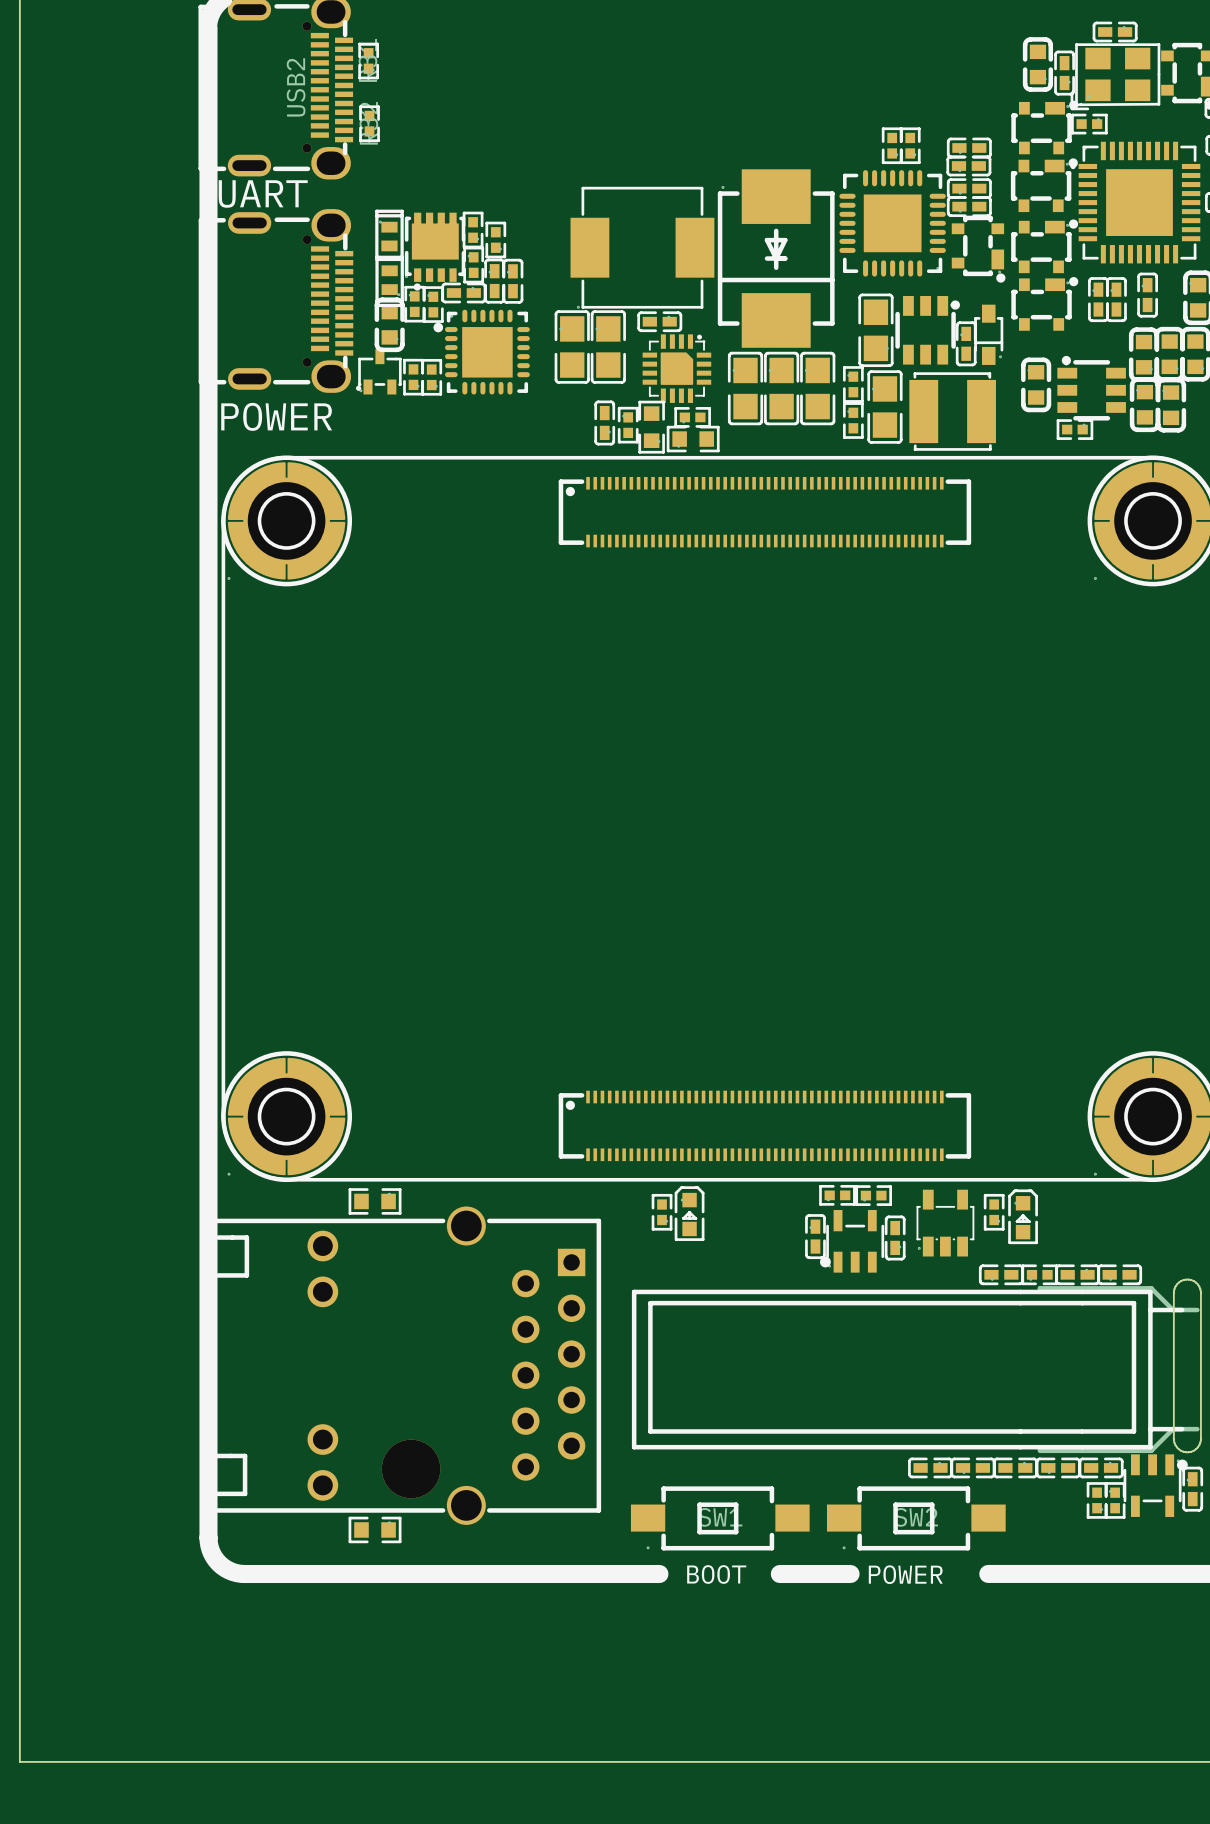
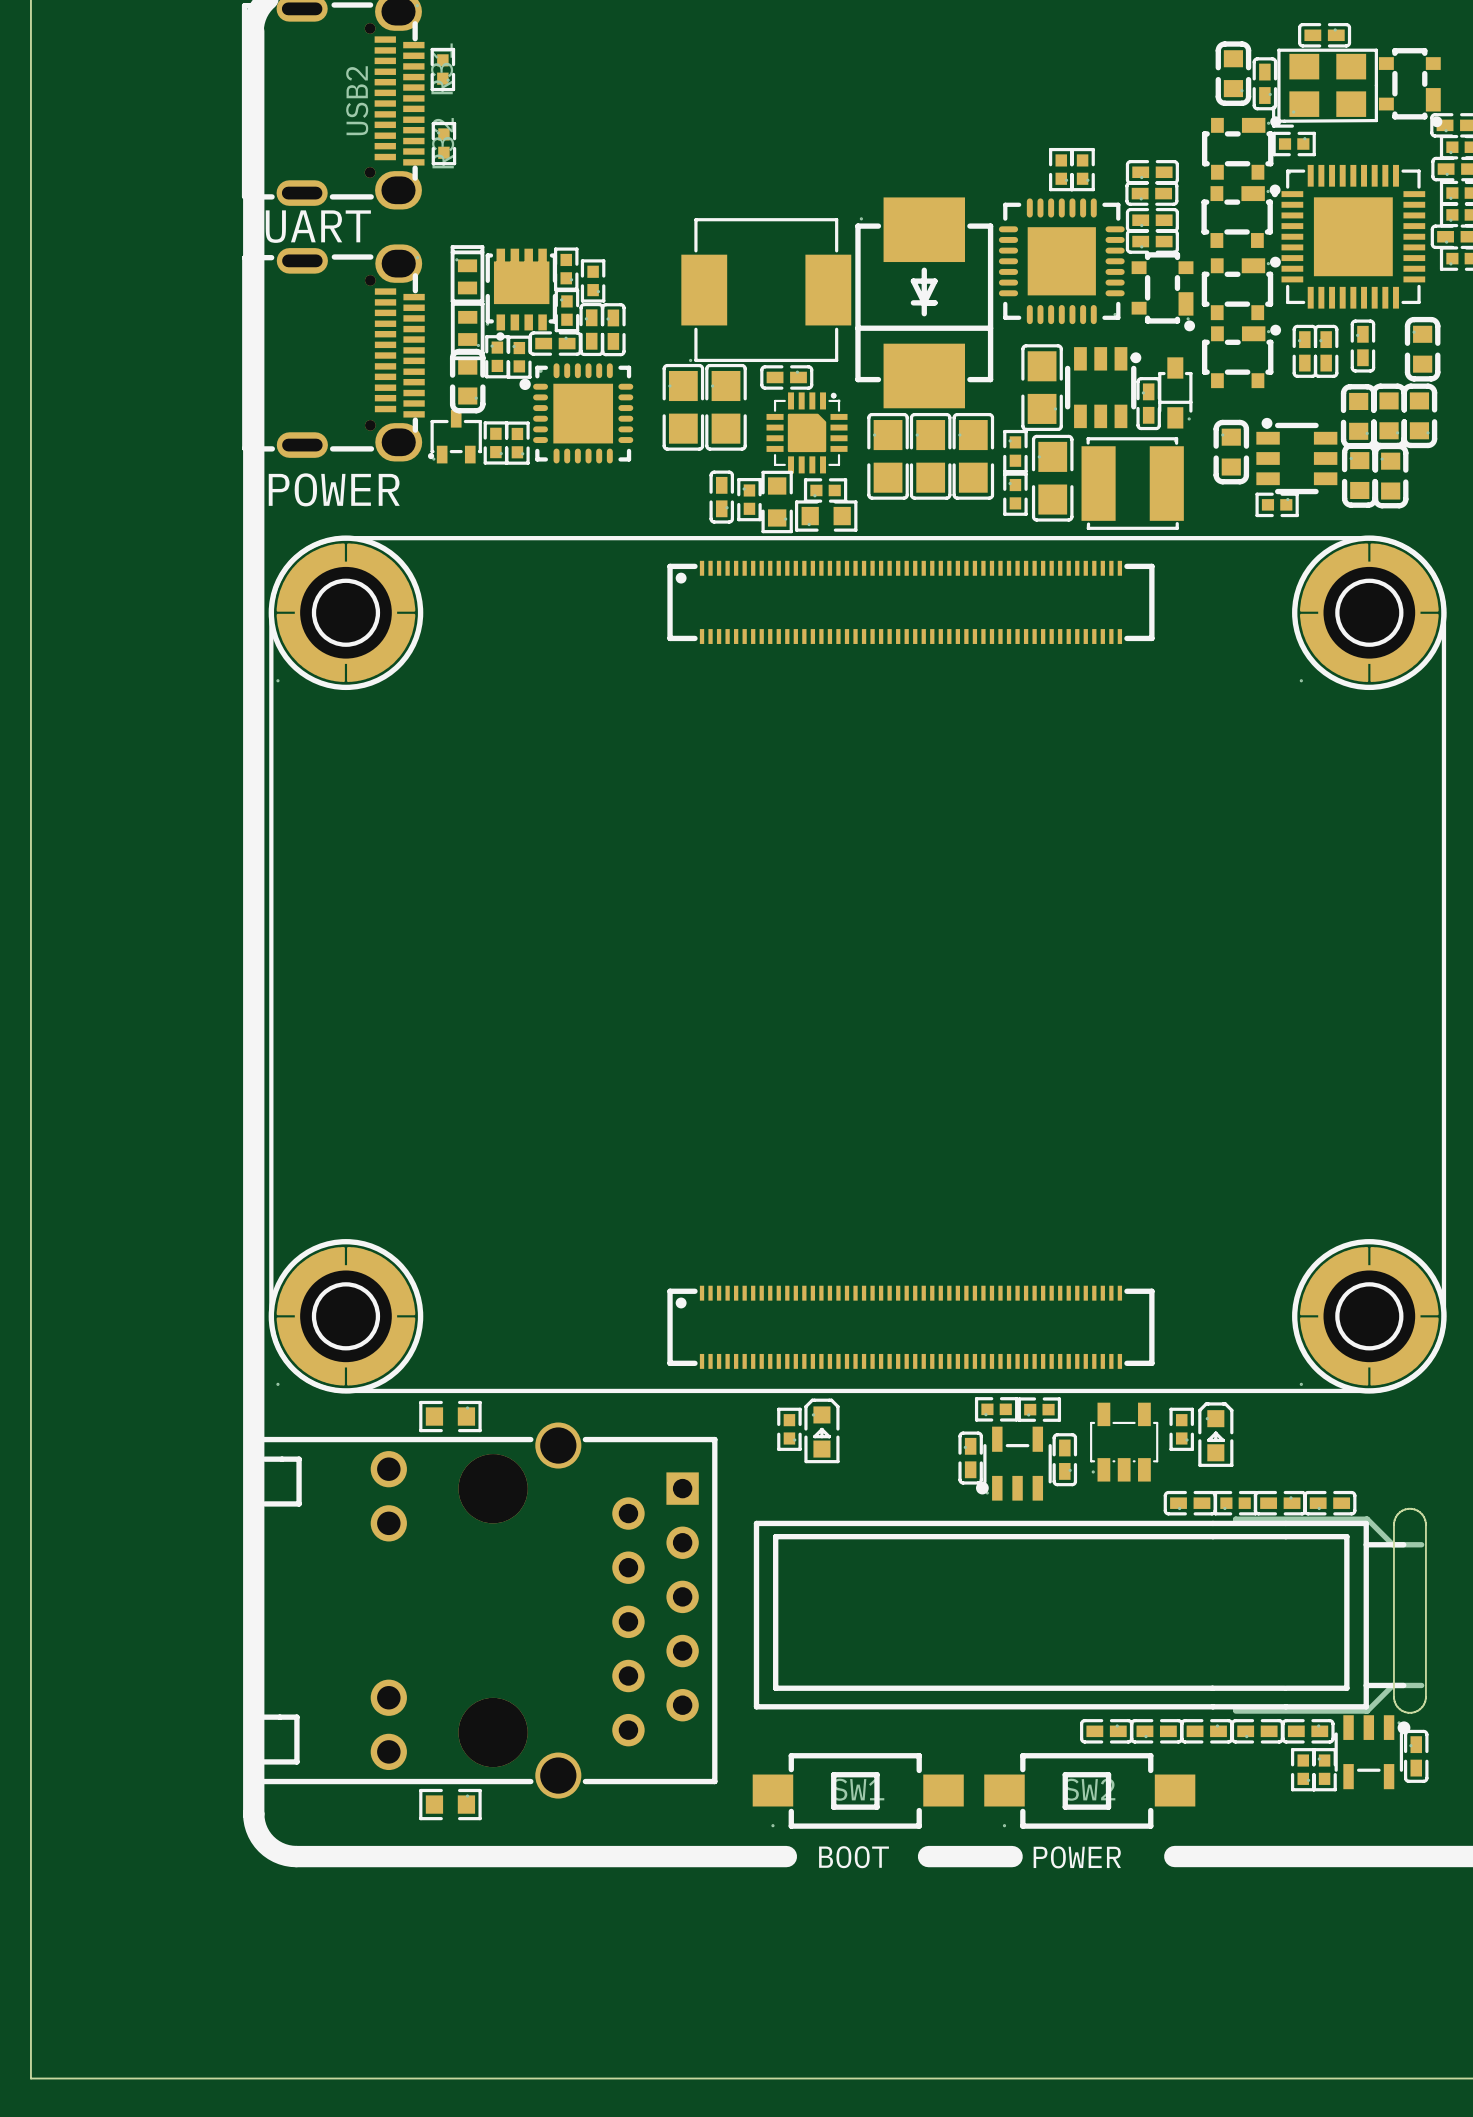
part footprint: [212, 1206, 602, 1525] -> [258, 1422, 718, 1799]

